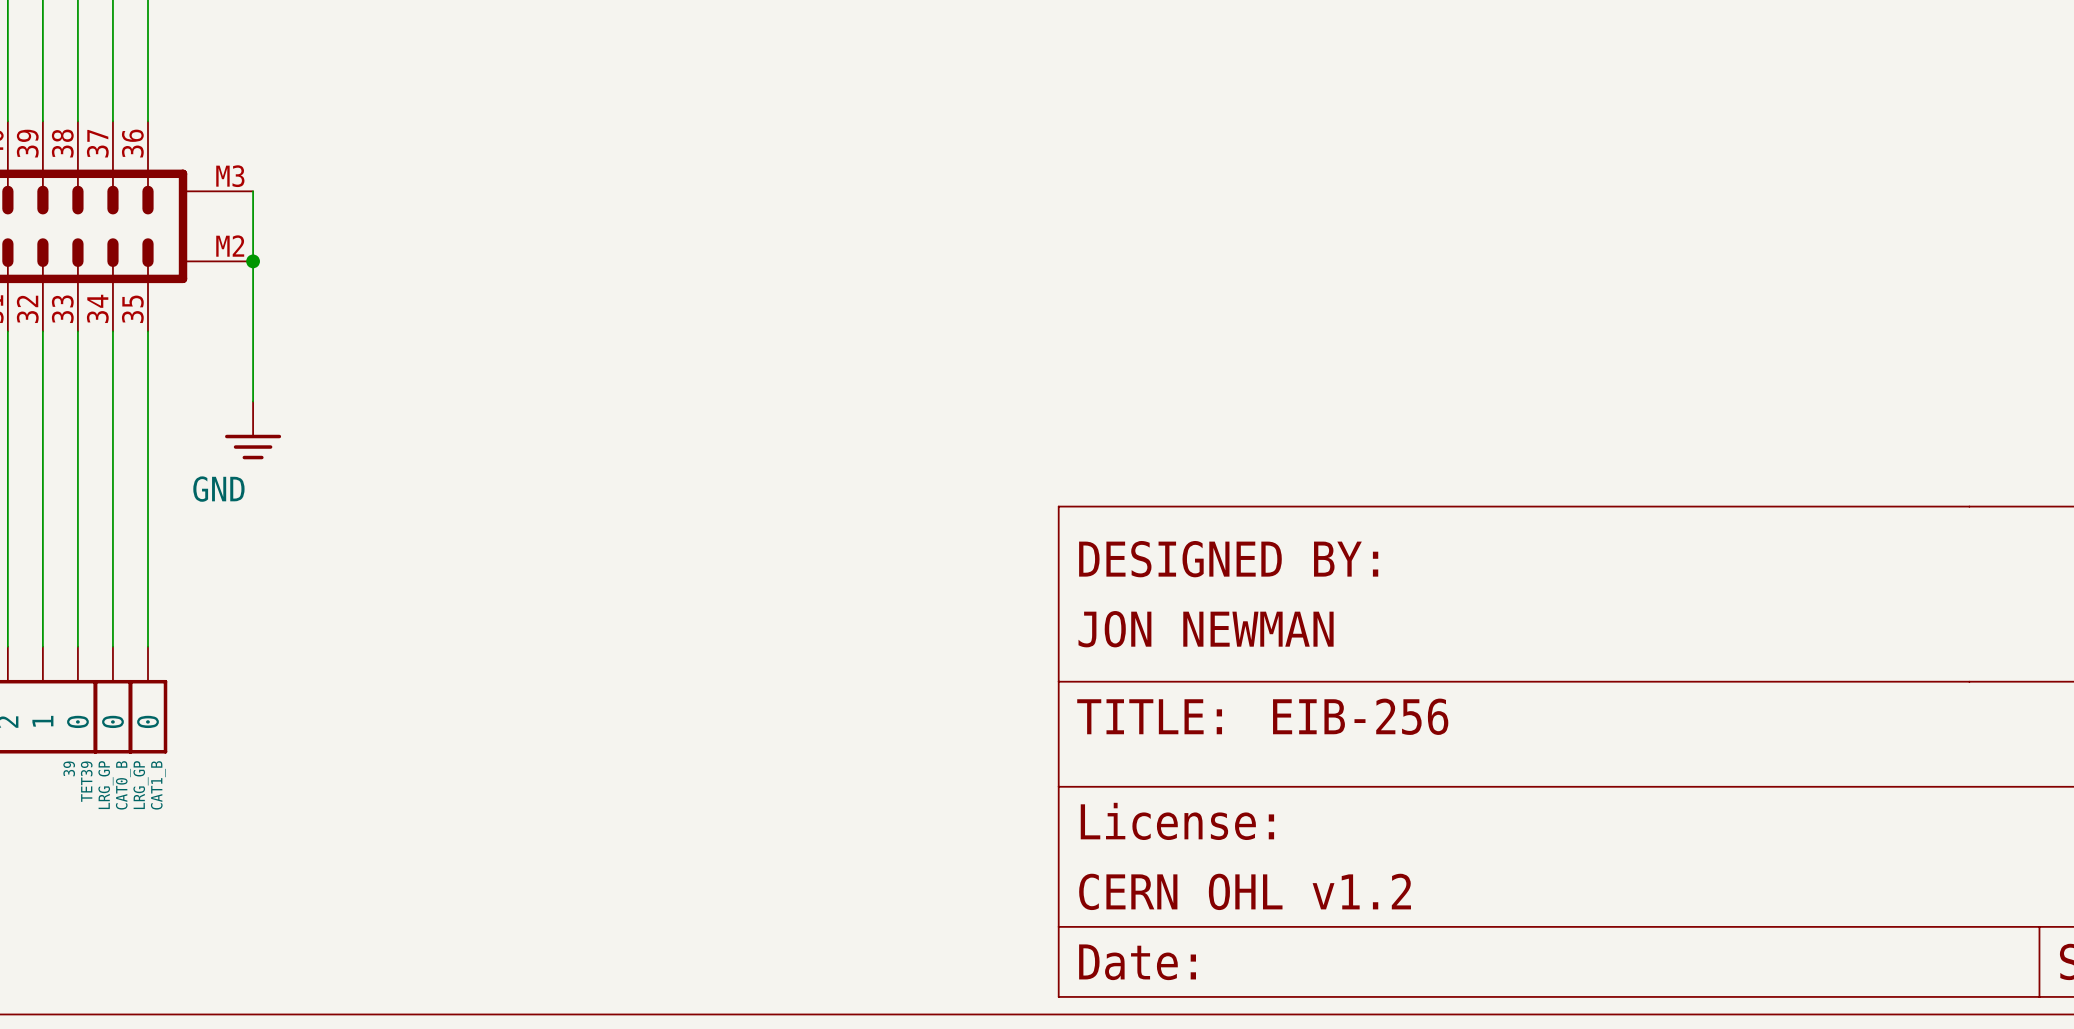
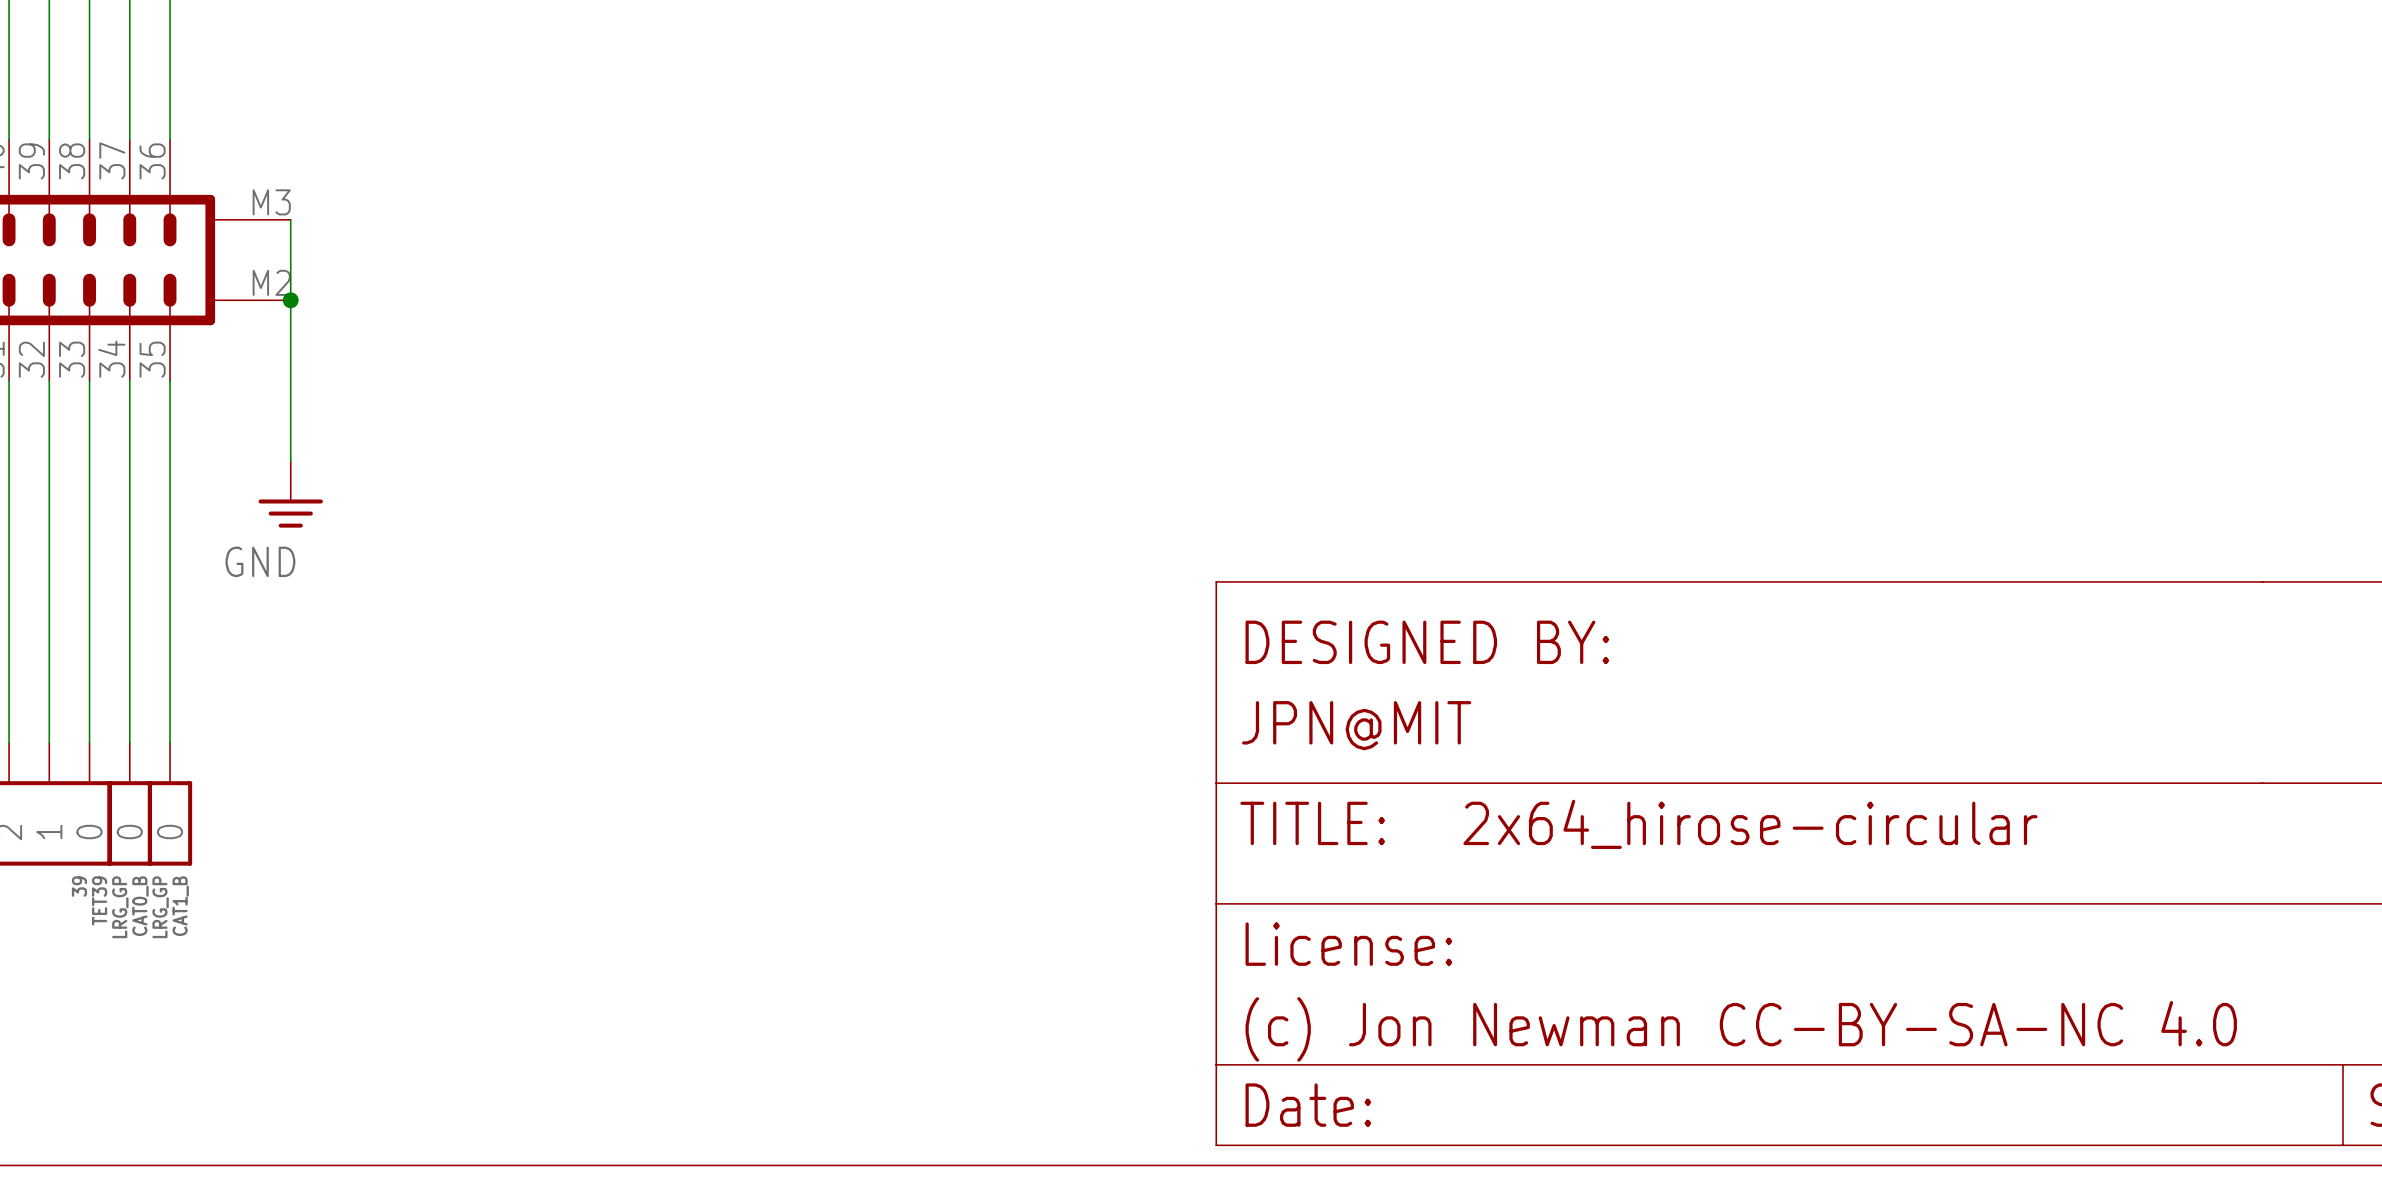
part text: JON NEWMAN (1206, 629) -> JPN@MIT (1356, 725)
part text: EIB-256 (1360, 716) -> 2x64_hirose-circular (1750, 824)
part text: CERN OHL v1.2 (1245, 891) -> (c) Jon Newman CC-BY-SA-NC 4.0 (1741, 1029)

